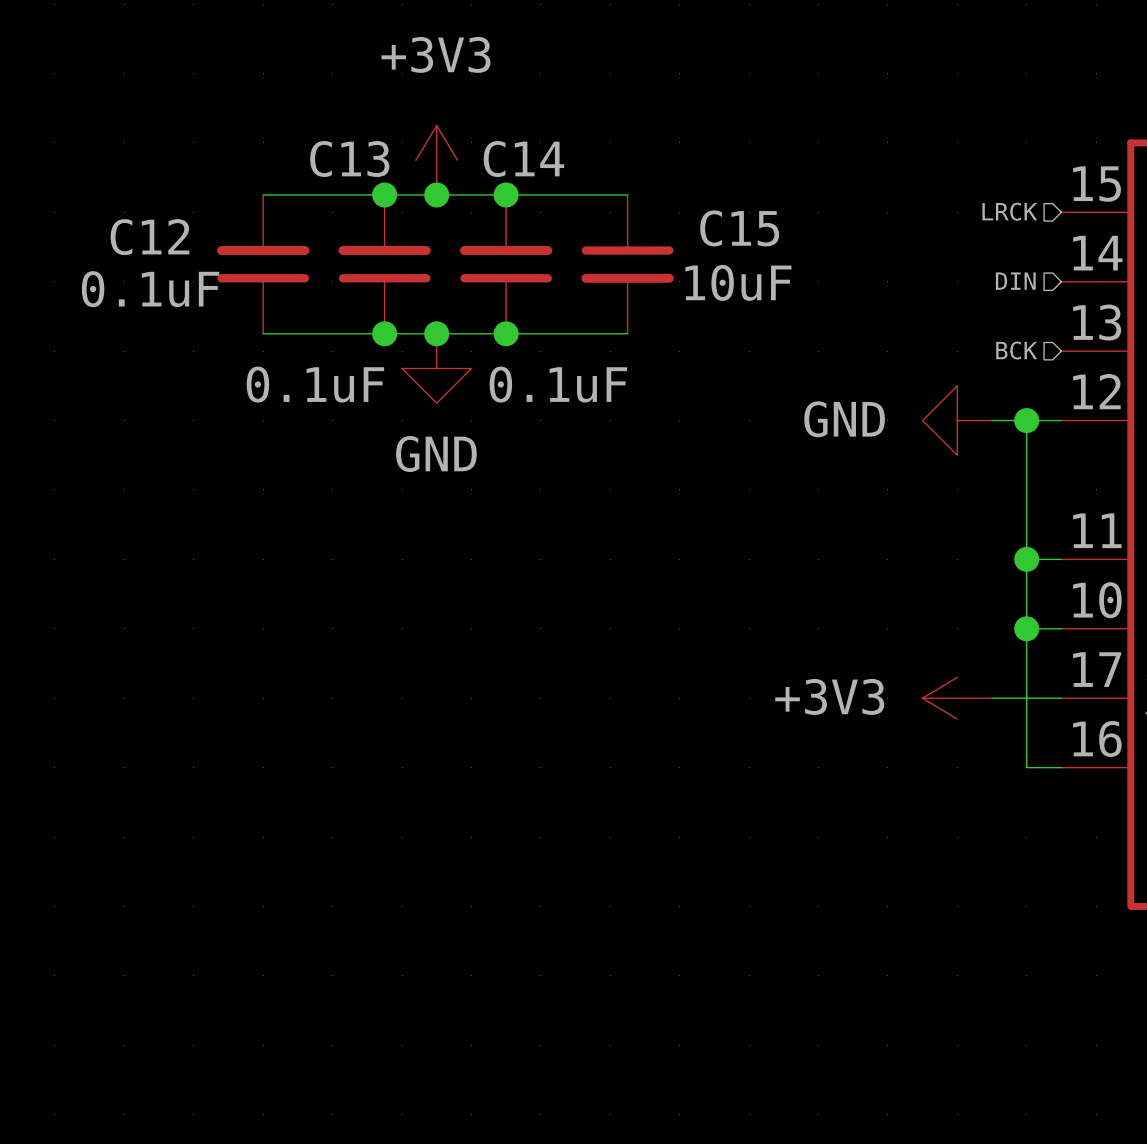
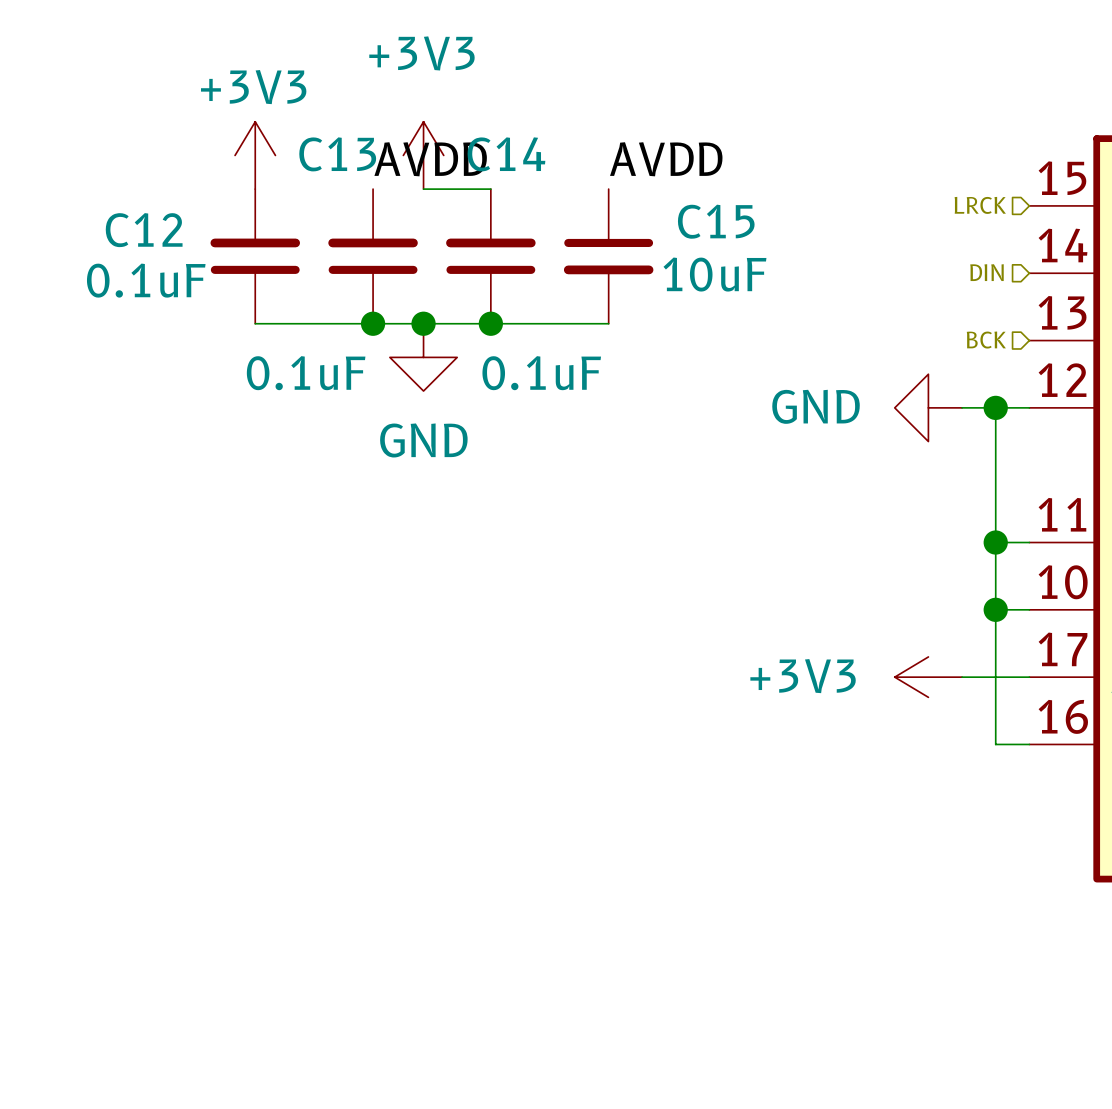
power symbol: none -> +3V3 (255, 155)
label: none -> AVDD (430, 159)
label: none -> AVDD (666, 159)
wire: (263, 194) (436, 194) -> none
junction: (384, 194) -> none
junction: (436, 194) -> none
wire: (506, 194) (627, 194) -> none
junction: (506, 194) -> none

